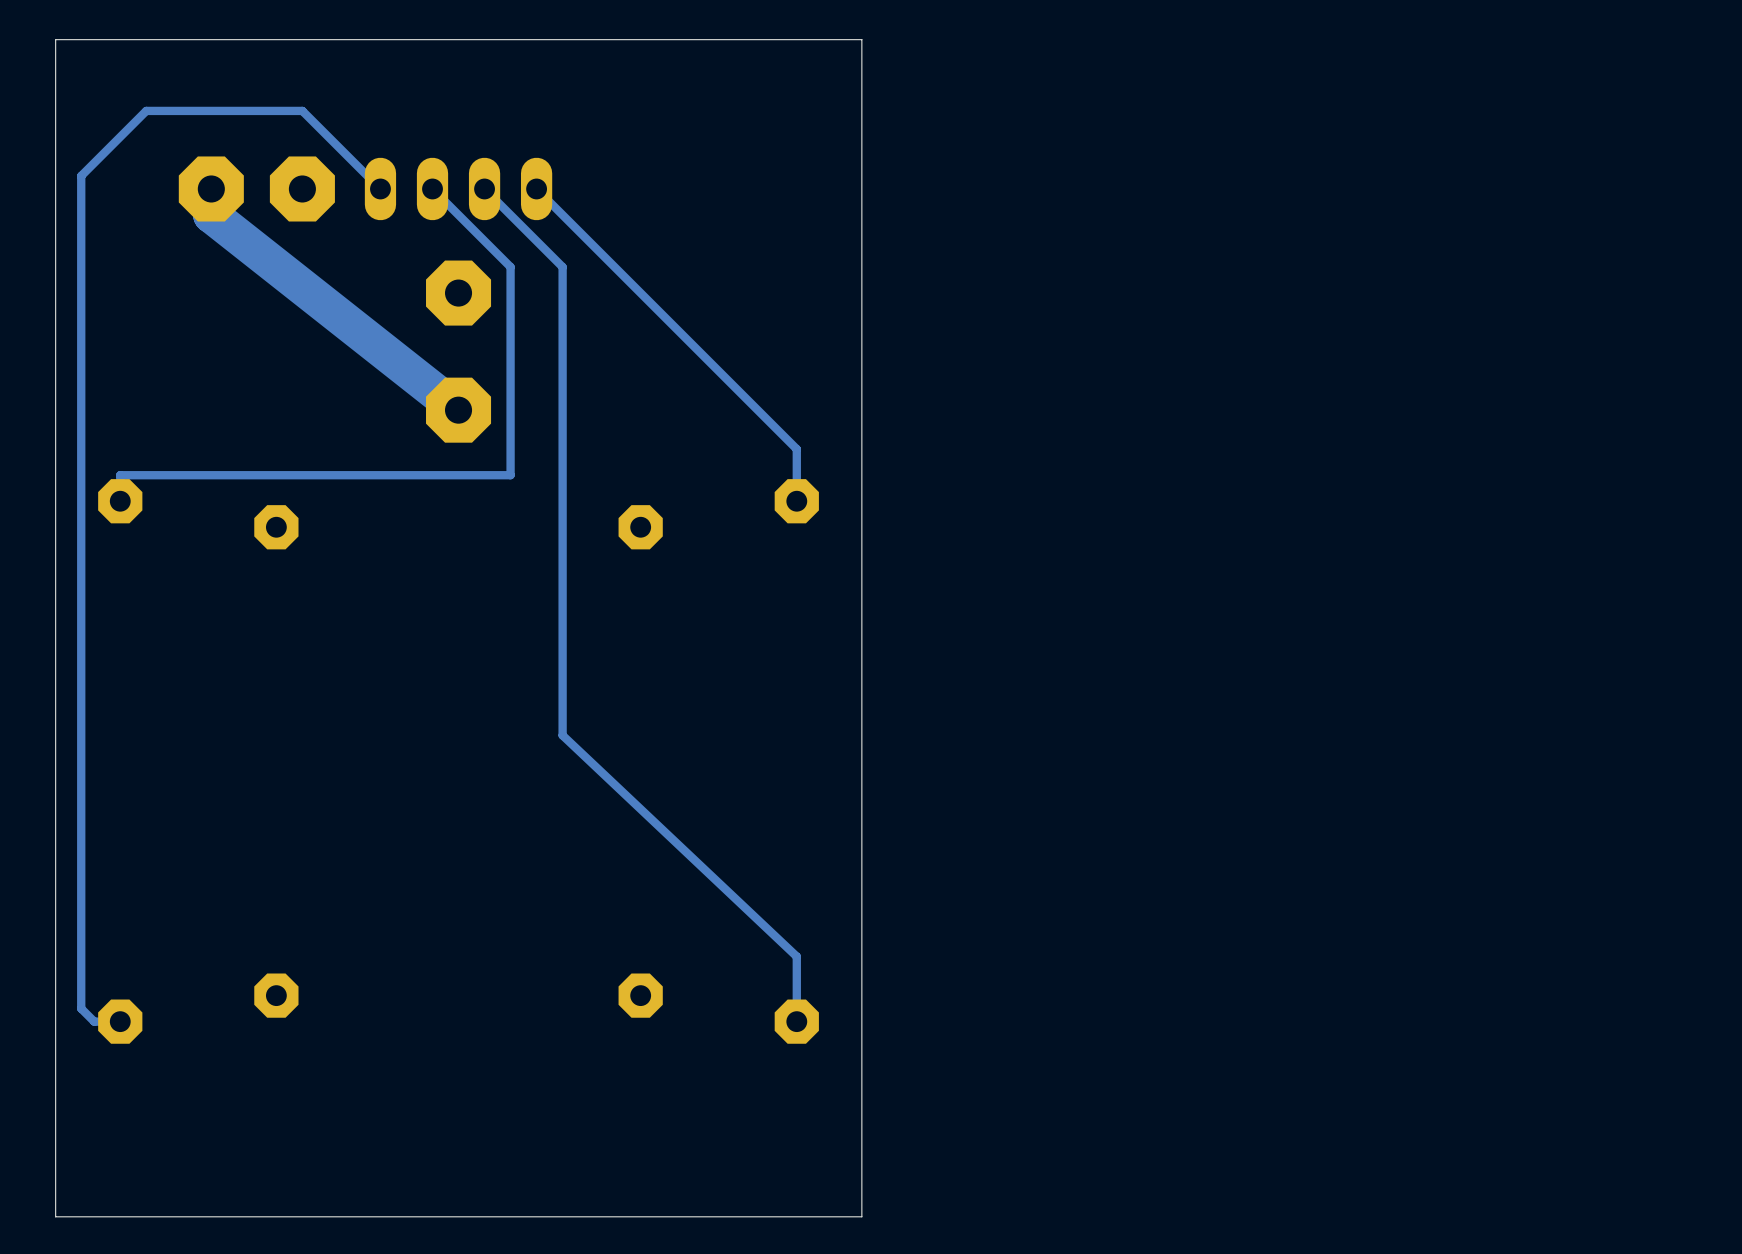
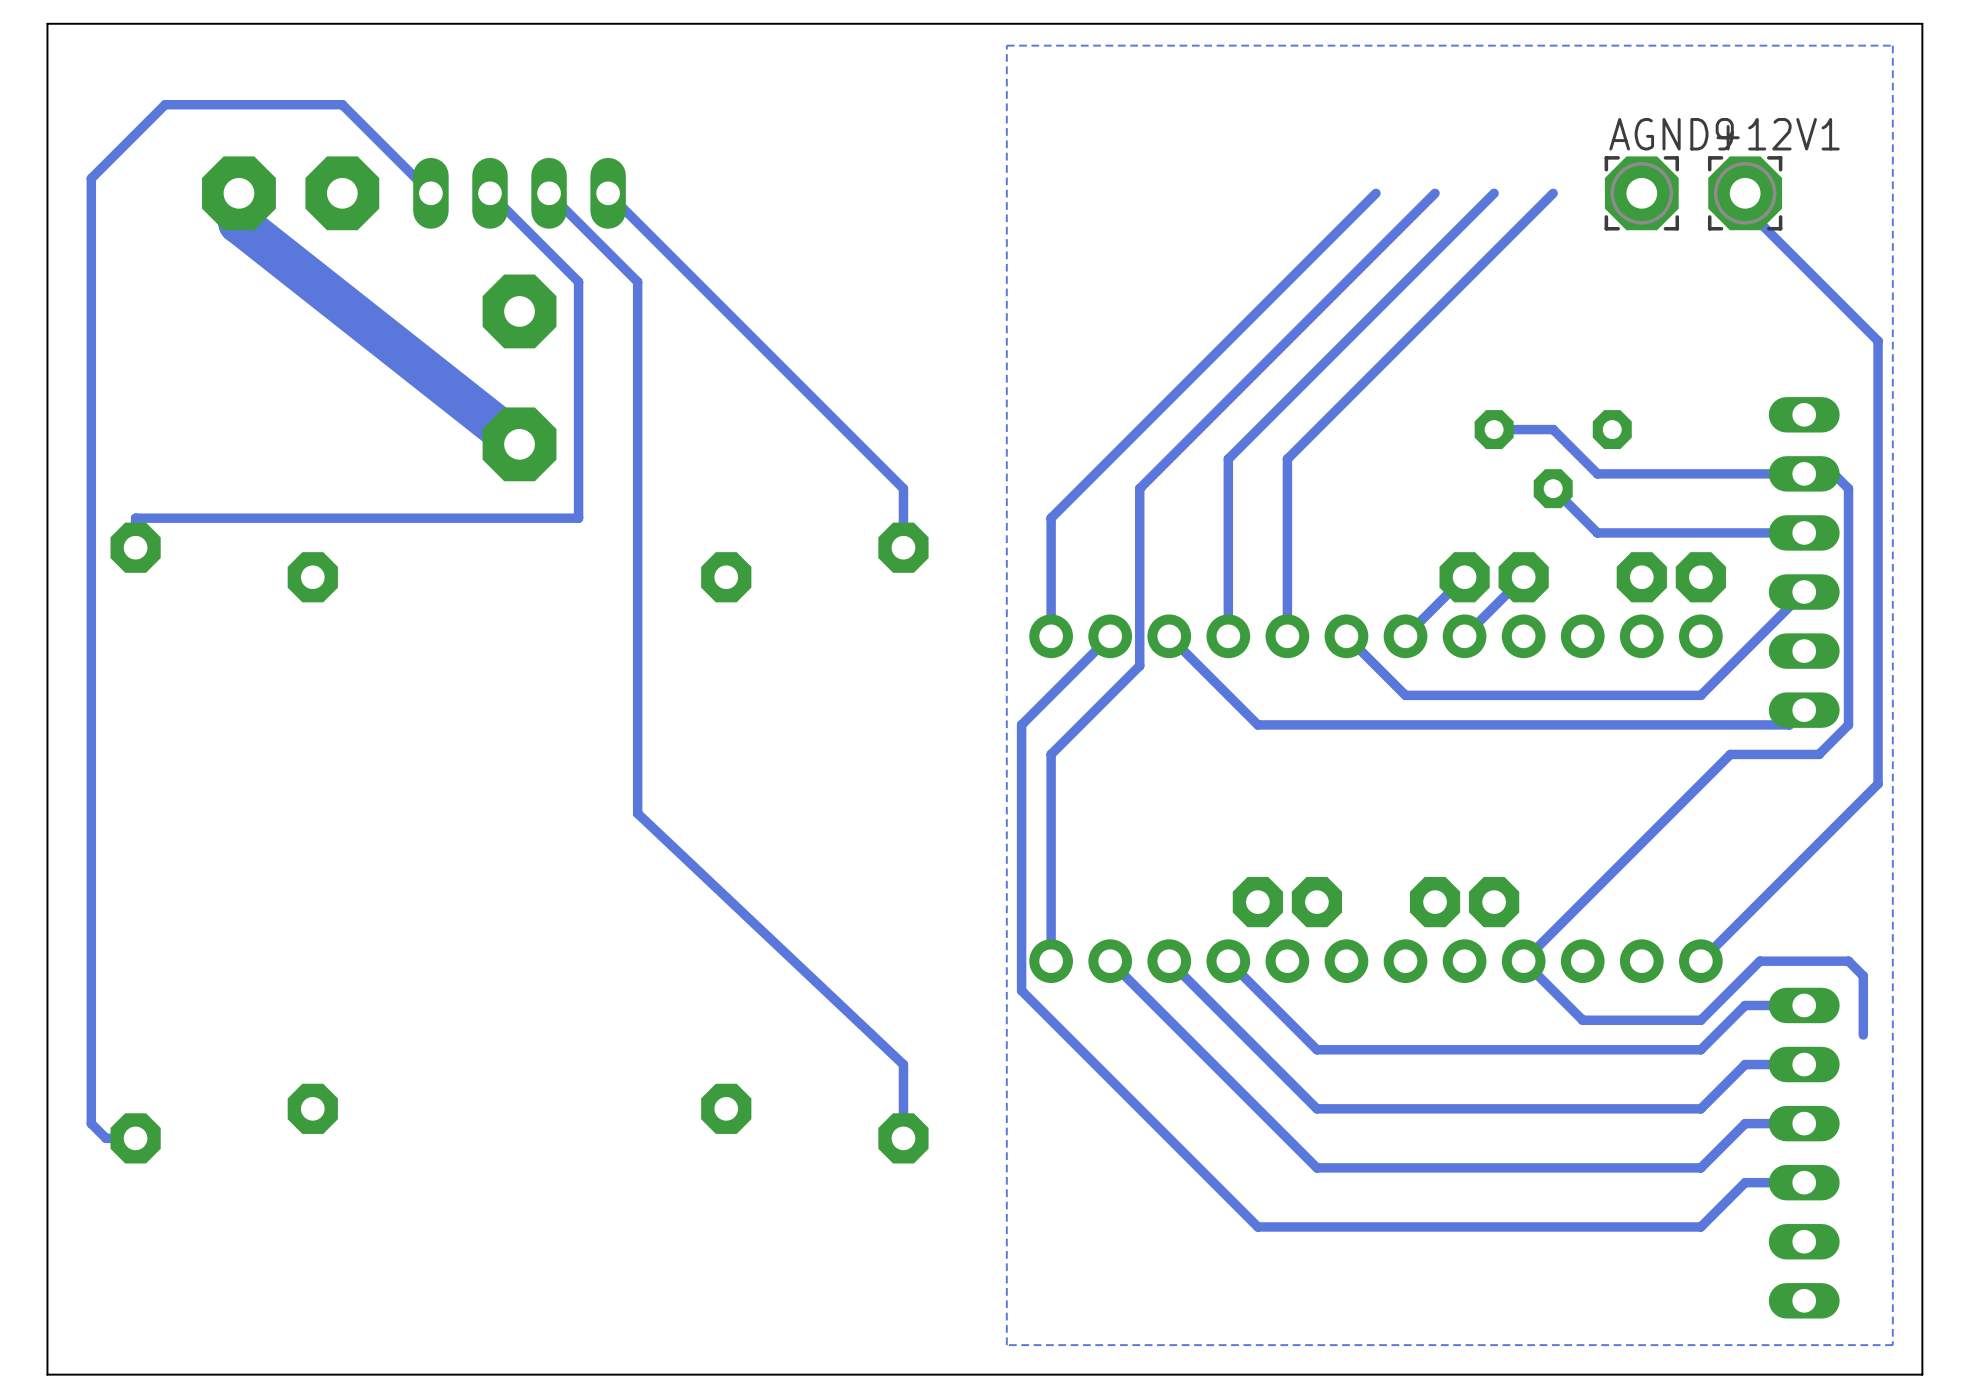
board edge: (861, 39) (861, 1216) (55, 1216) (55, 39) -> (977, 23) (1922, 23) (1922, 1374) (47, 1374) (47, 23) (62, 23)
zone outline: none -> (1892, 45) (1892, 1345) (1006, 1345) (1006, 45) (1892, 45)
track: none -> (1375, 193) (1051, 518) (1051, 636)
track: none -> (1435, 193) (1139, 488) (1139, 665) (1051, 754) (1051, 961)
track: none -> (1494, 193) (1228, 459) (1228, 636)
track: none -> (1553, 193) (1287, 459) (1287, 636)
AGND9: none -> (1641, 193)
track: none -> (1745, 193) (1745, 208) (1878, 340) (1878, 783) (1700, 961)
+12V1: none -> (1745, 193)
track: none -> (1494, 429) (1553, 429) (1597, 473) (1833, 473) (1848, 488) (1848, 724) (1818, 754) (1730, 754) (1523, 961) (1582, 1020) (1700, 1020) (1759, 961) (1848, 961) (1863, 975) (1863, 1035)
part: none -> (1553, 459)
track: none -> (1553, 488) (1597, 532) (1804, 532)
part: none -> (1804, 562)
track: none -> (1464, 577) (1405, 636)
part: none -> (1464, 577)
track: none -> (1523, 577) (1464, 636)
part: none -> (1523, 577)
part: none -> (1641, 577)
part: none -> (1700, 577)
track: none -> (1804, 592) (1700, 695) (1405, 695) (1346, 636)
track: none -> (1110, 636) (1021, 724) (1021, 990) (1257, 1226) (1700, 1226) (1745, 1182) (1804, 1182)
track: none -> (1169, 636) (1257, 724) (1789, 724) (1804, 710)
part: none -> (1375, 636)
part: none -> (1257, 902)
part: none -> (1316, 902)
part: none -> (1435, 902)
part: none -> (1494, 902)
track: none -> (1110, 961) (1316, 1167) (1700, 1167) (1745, 1123) (1804, 1123)
track: none -> (1169, 961) (1316, 1108) (1700, 1108) (1745, 1064) (1804, 1064)
track: none -> (1228, 961) (1316, 1049) (1700, 1049) (1745, 1005) (1804, 1005)
part: none -> (1375, 961)
part: none -> (1804, 1153)

